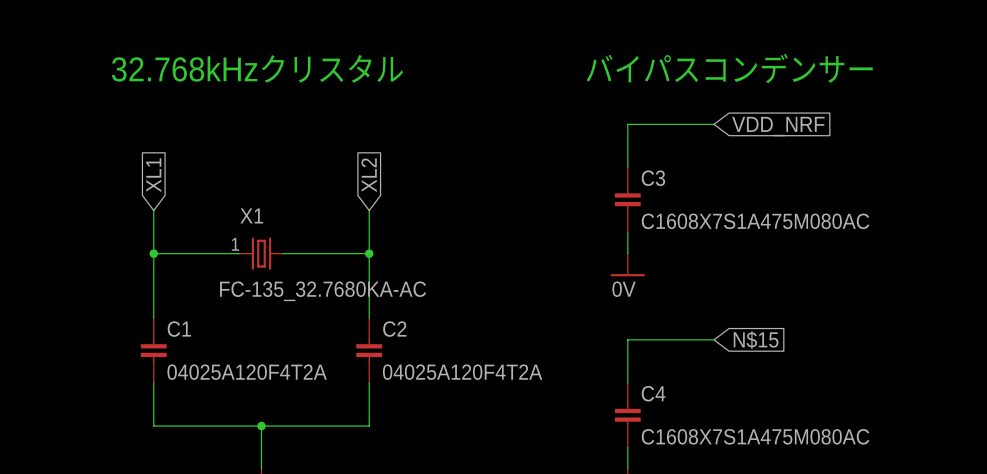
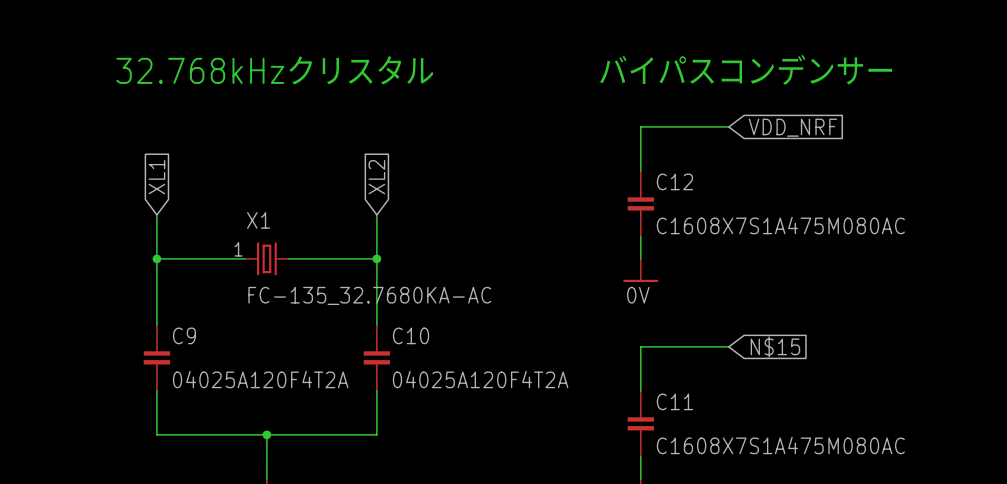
C3 name: C3 (653, 178) -> C12 (674, 181)
X1 value position: FC-135_32.7680KA-AC (323, 291) -> FC-135_32.7680KA-AC (369, 295)
C1 name: C1 (179, 329) -> C9 (184, 335)
C2 name: C2 (394, 329) -> C10 (411, 335)
C4 name: C4 (653, 393) -> C11 (674, 401)

